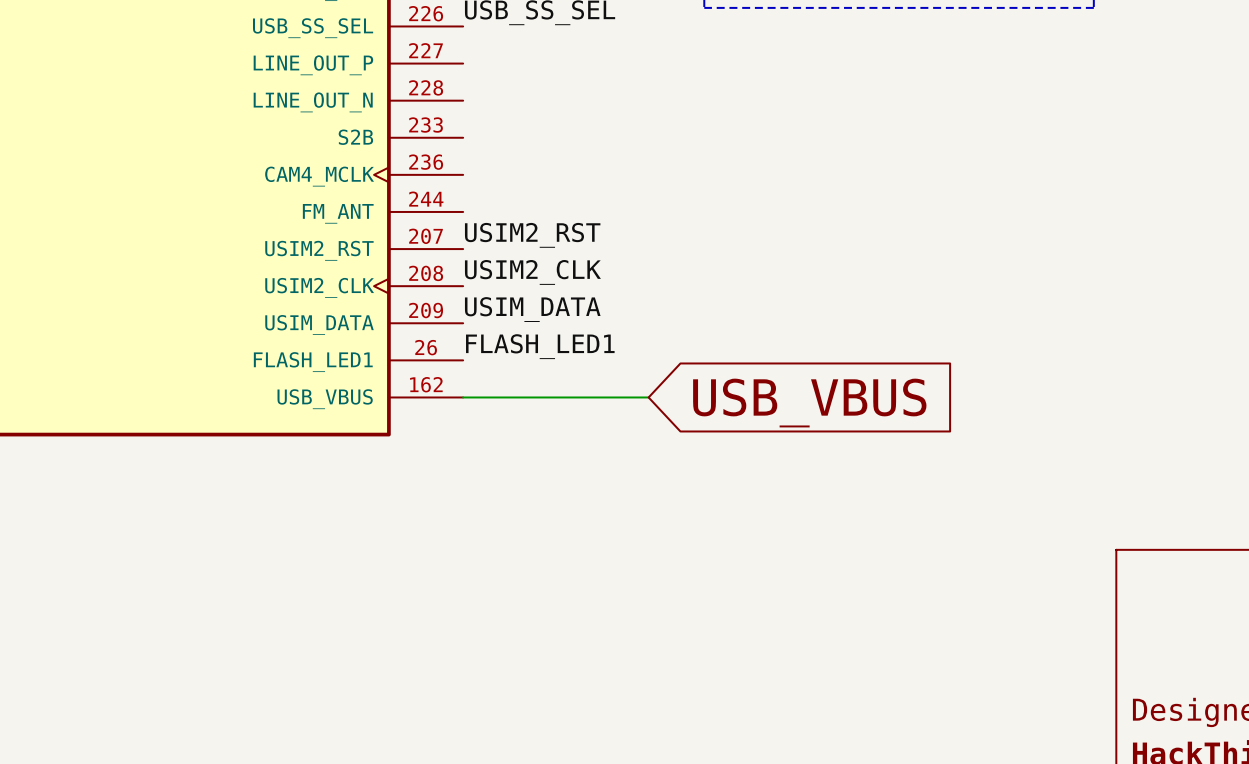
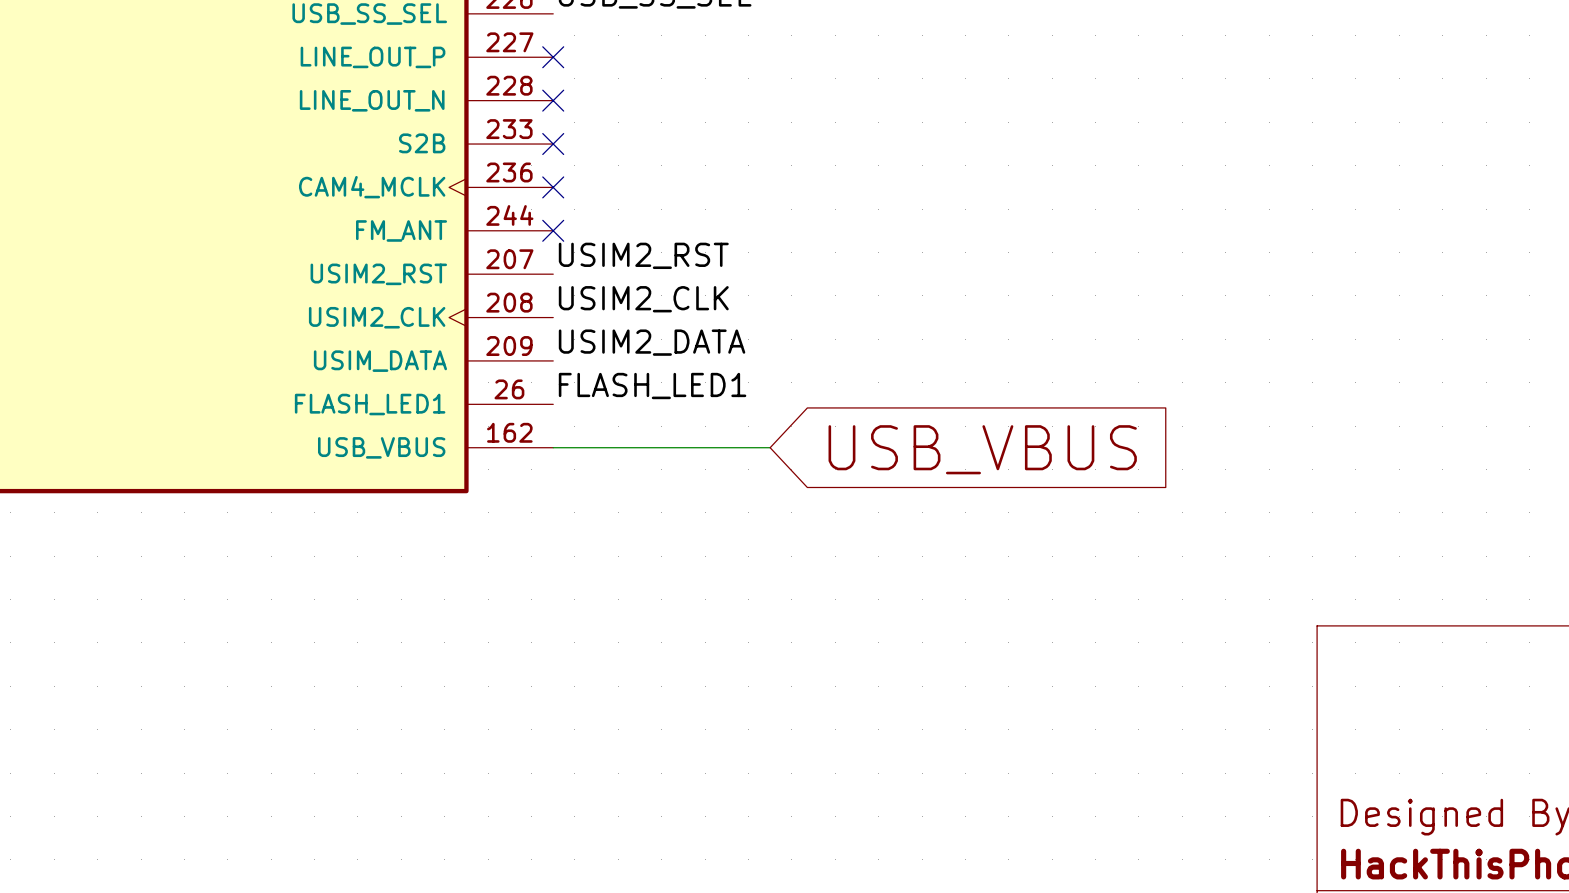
no-connect mark: none -> (553, 57)
no-connect mark: none -> (553, 100)
no-connect mark: none -> (553, 144)
no-connect mark: none -> (553, 187)
no-connect mark: none -> (553, 230)
label: USIM_DATA (532, 309) -> USIM2_DATA (652, 342)

